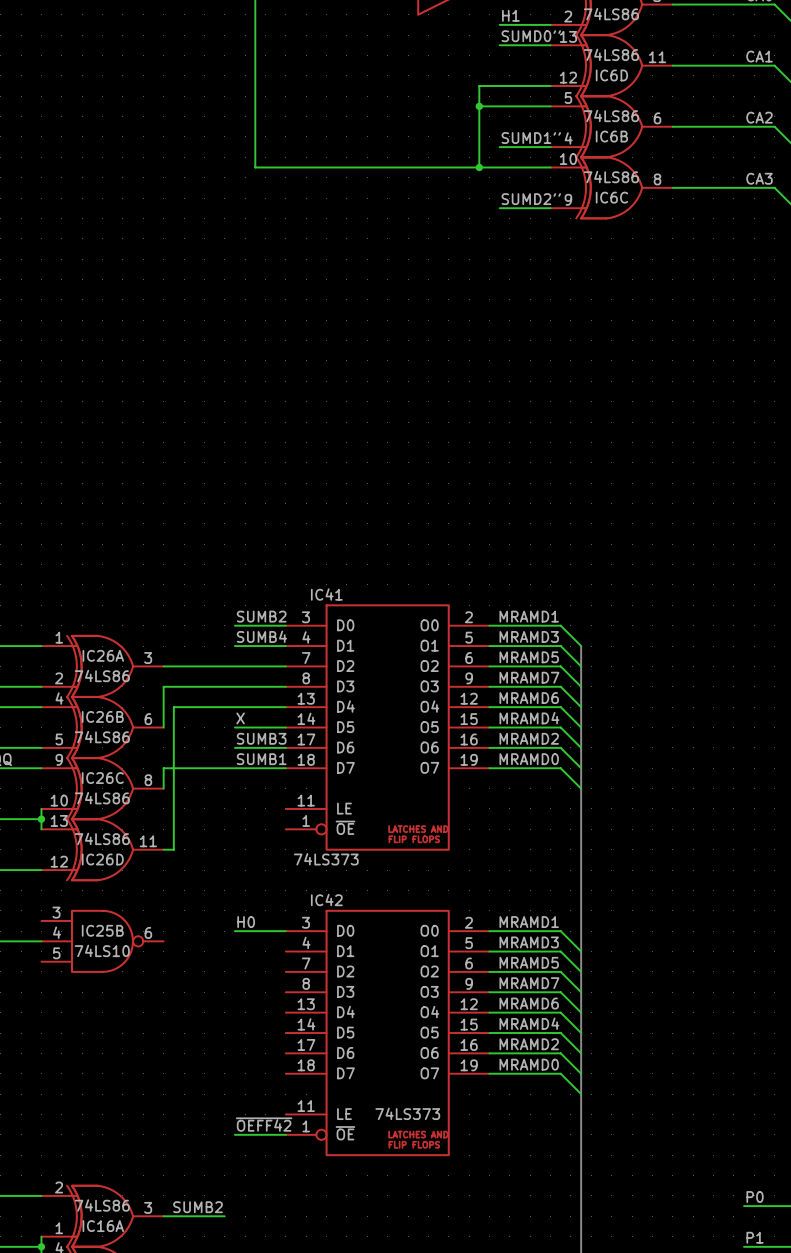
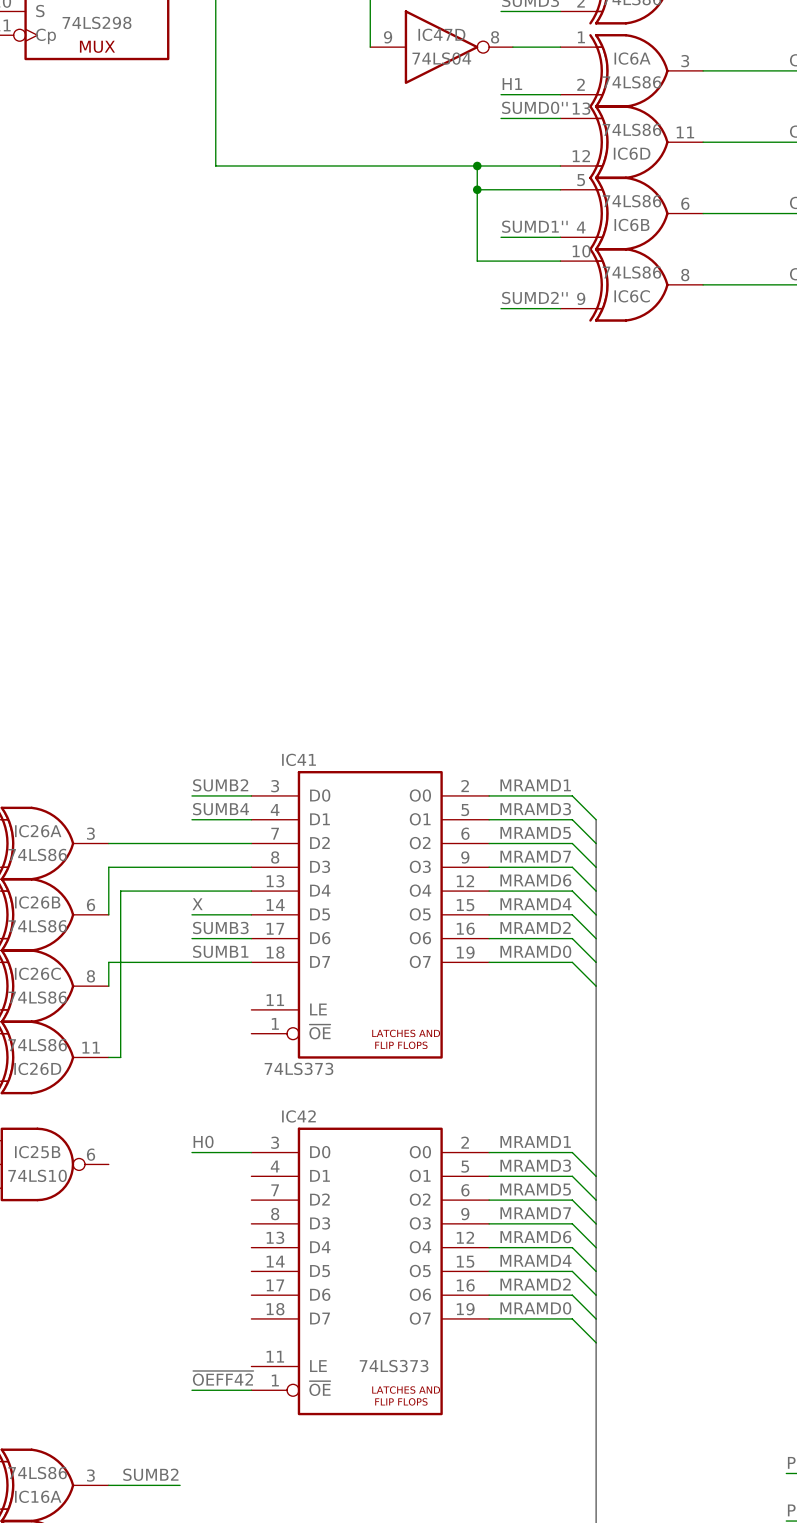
wire: (255, 86) (255, 167) (479, 167) -> (215, 165) (477, 165)
junction: none -> (477, 165)
junction: (479, 167) -> none

